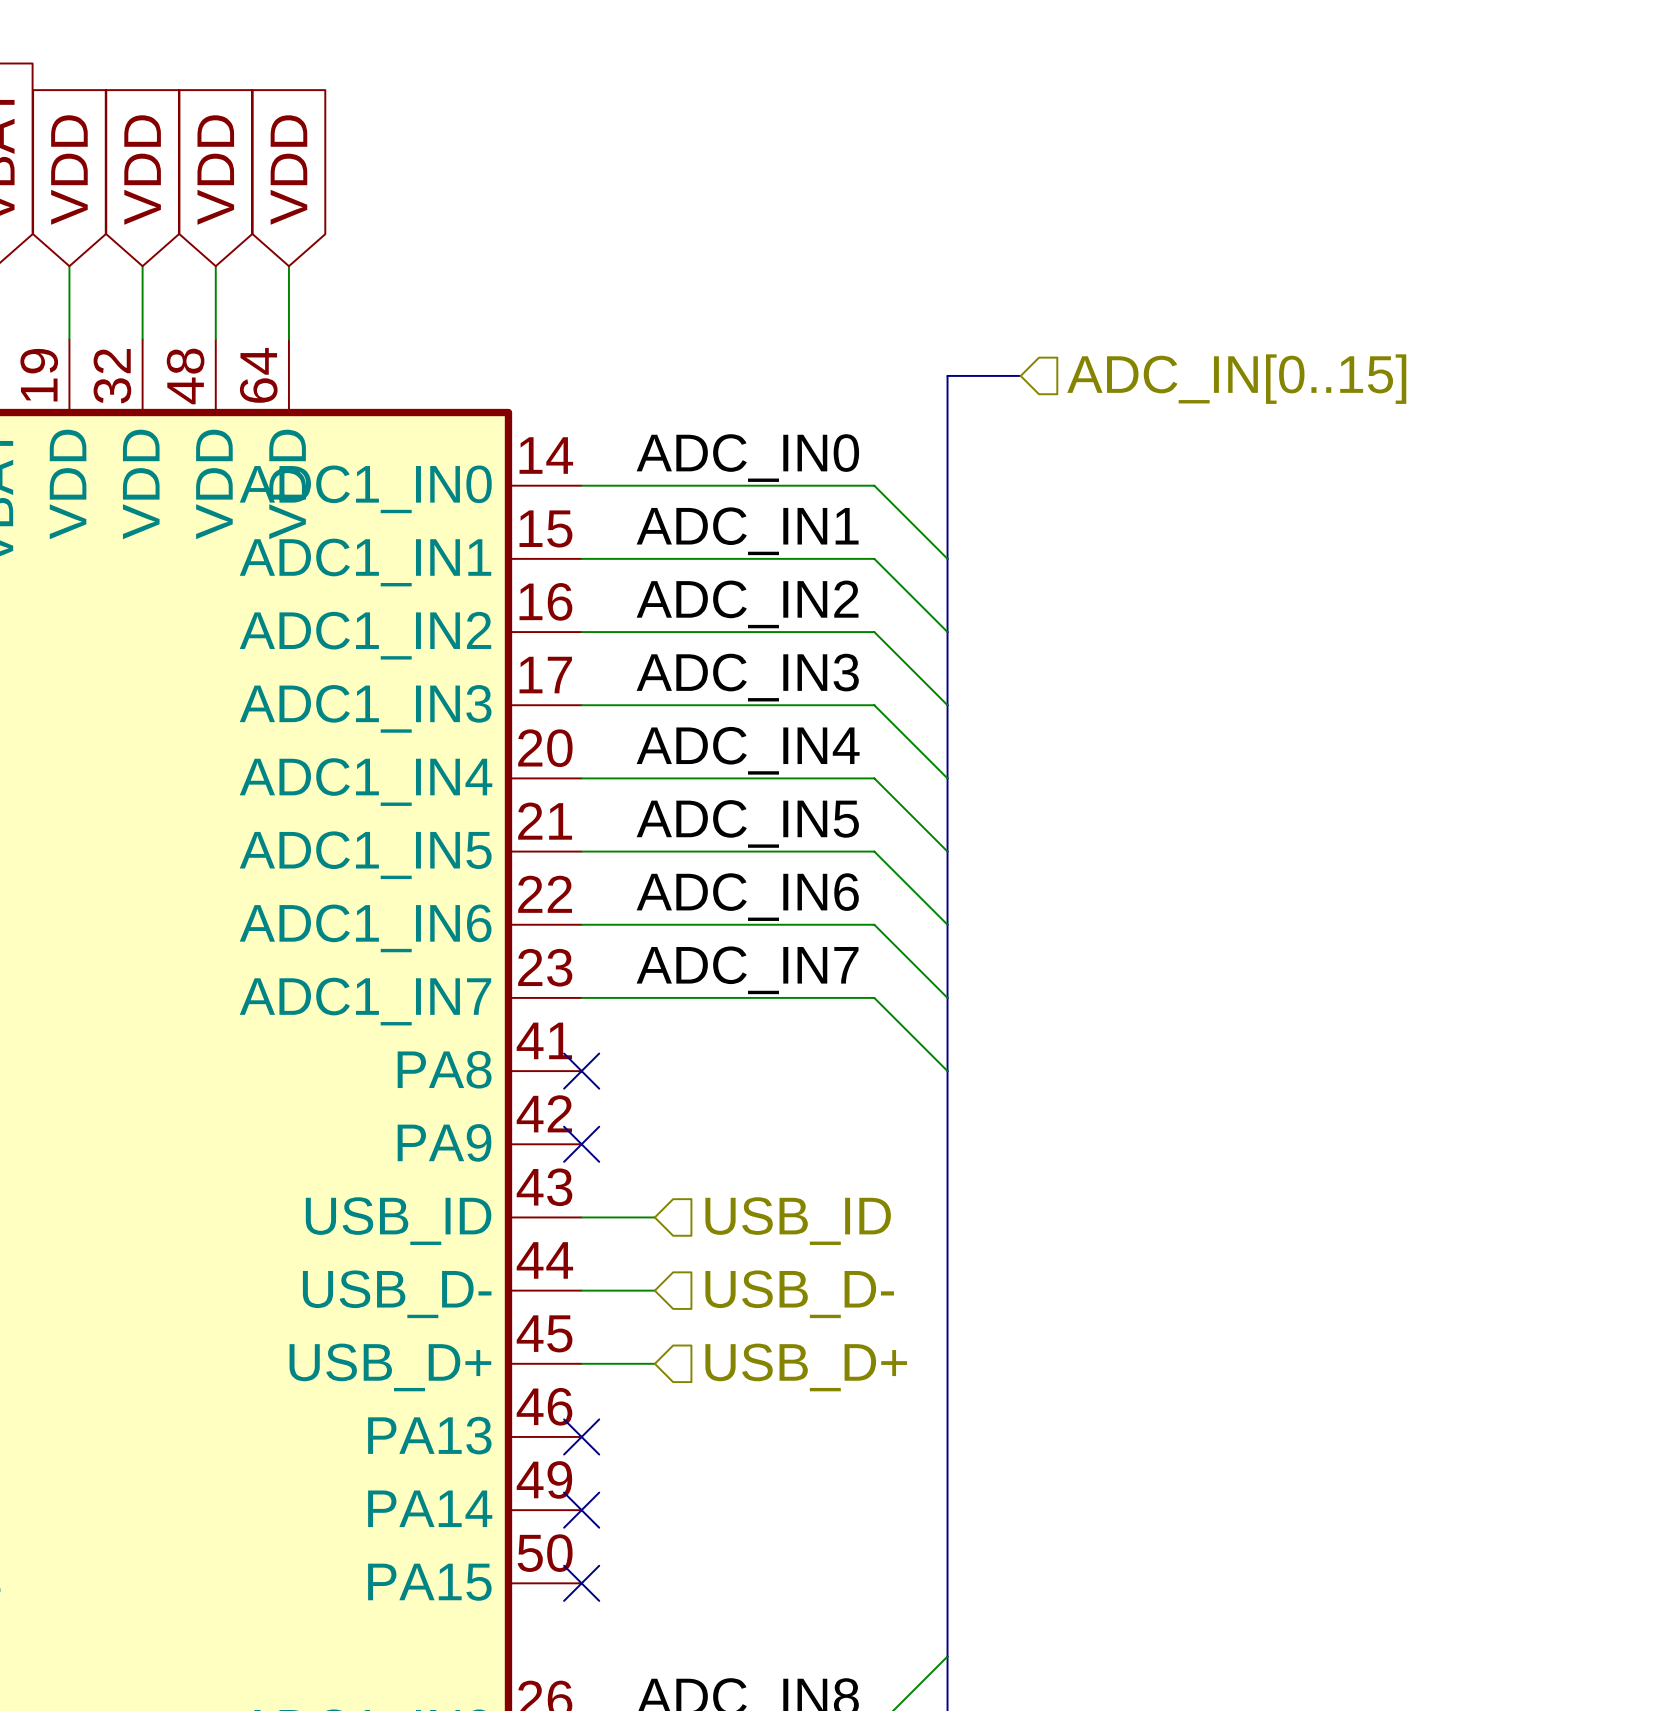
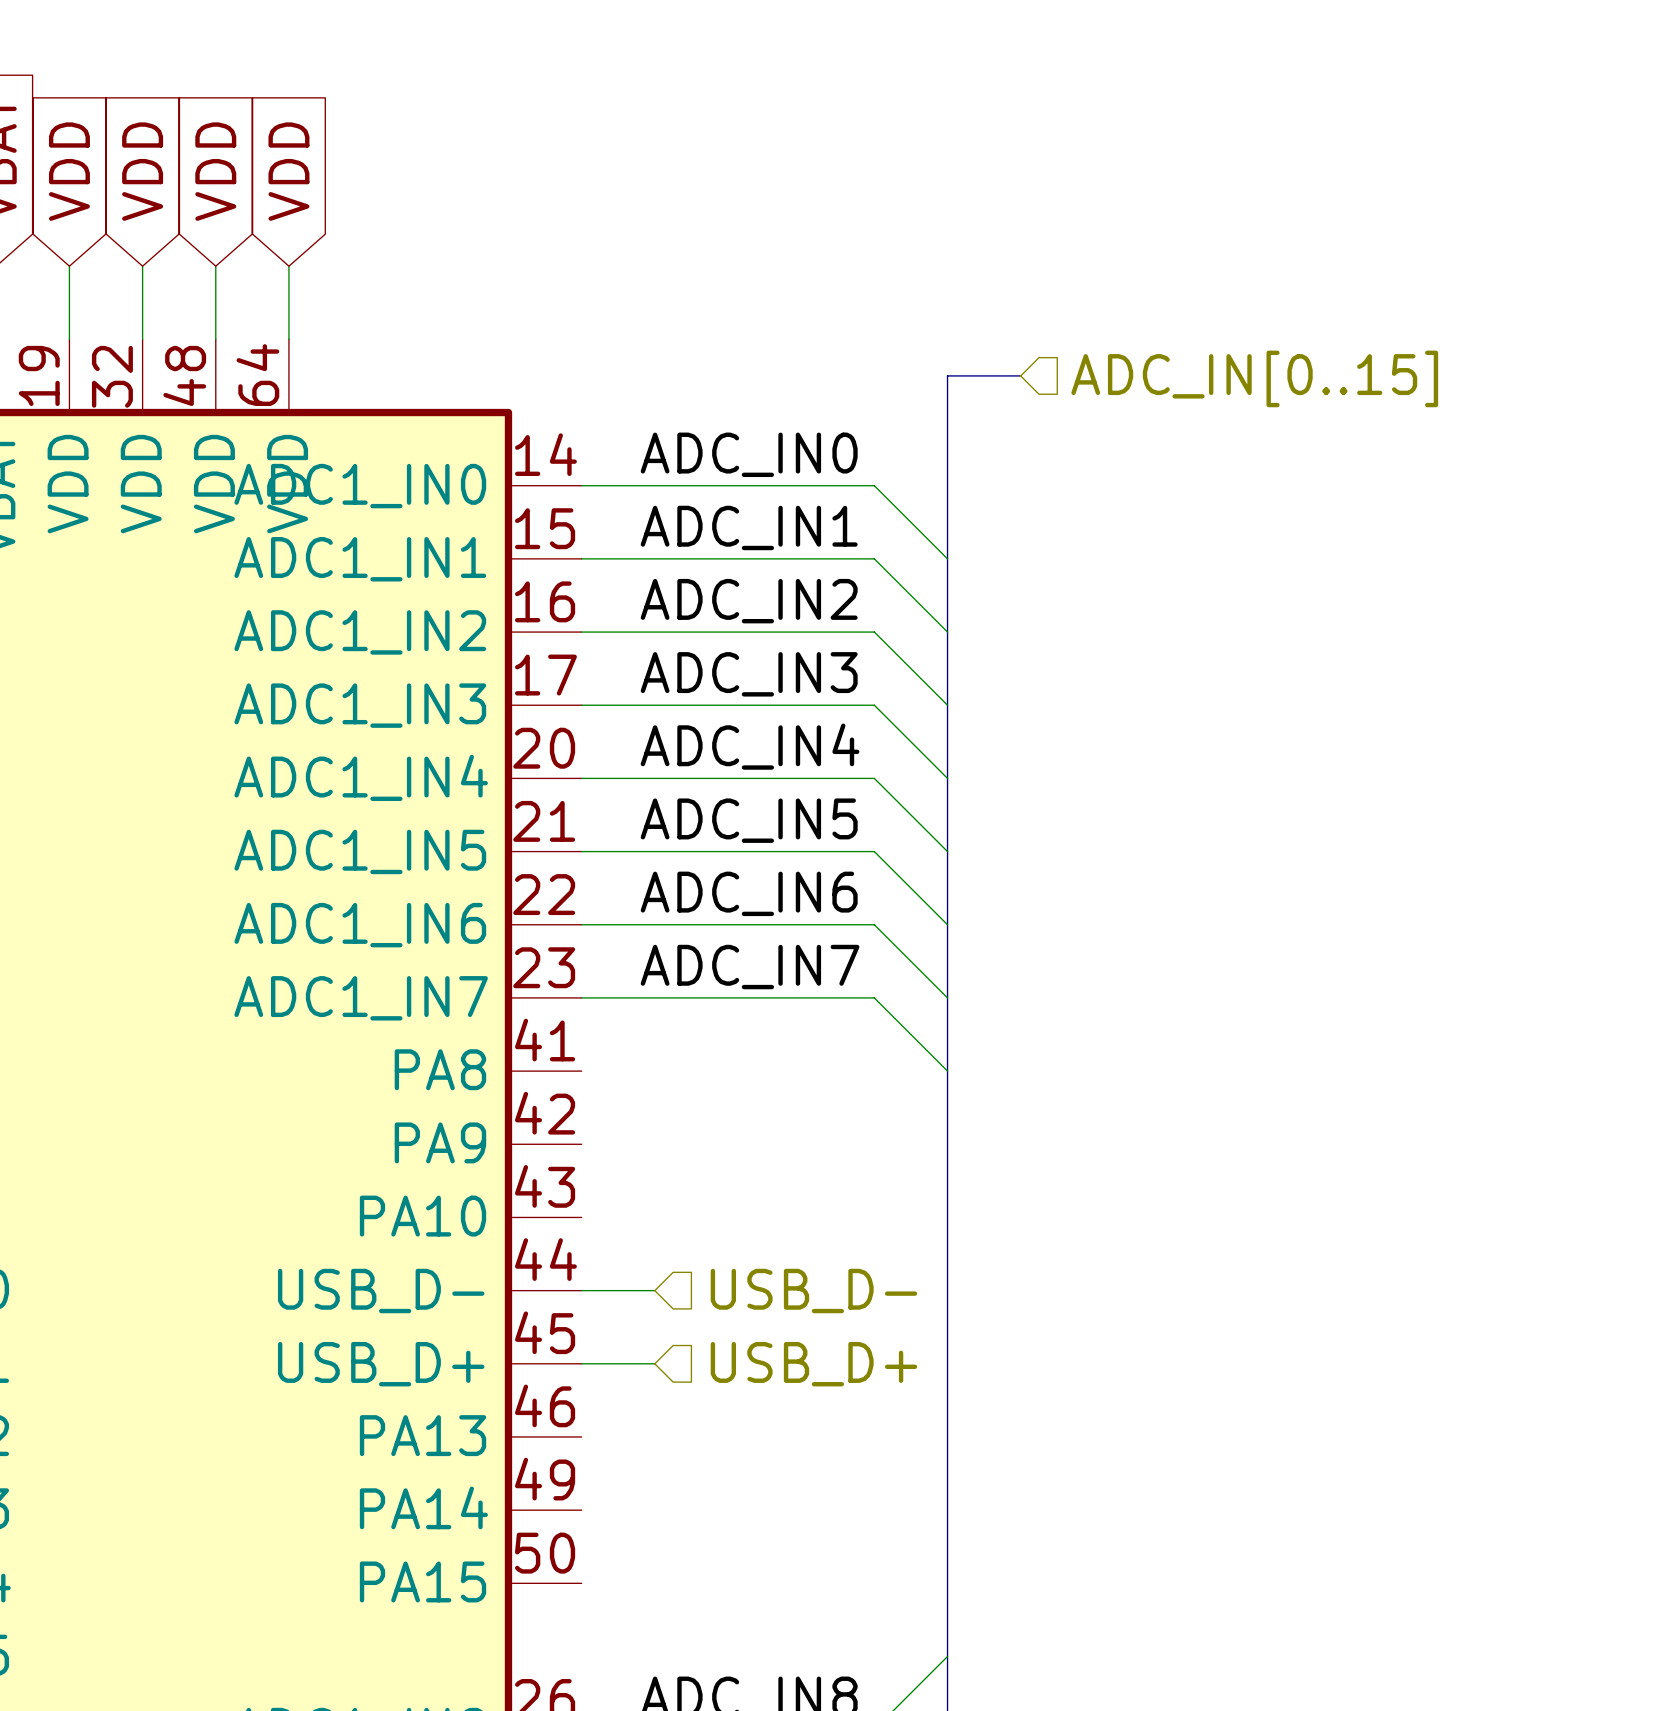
no-connect mark: (581, 1071) -> none
no-connect mark: (581, 1144) -> none
wire: (581, 1217) (654, 1217) -> none
part pin name: USB_ID (398, 1221) -> PA10 (423, 1216)
hierarchical label: USB_ID (798, 1221) -> none
no-connect mark: (581, 1436) -> none
no-connect mark: (581, 1510) -> none
no-connect mark: (581, 1583) -> none

